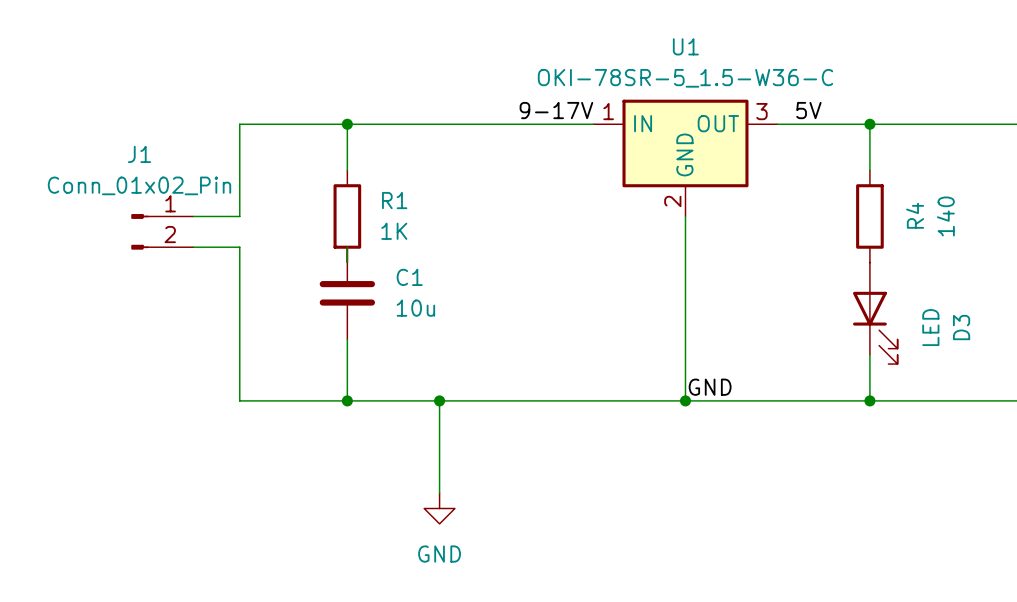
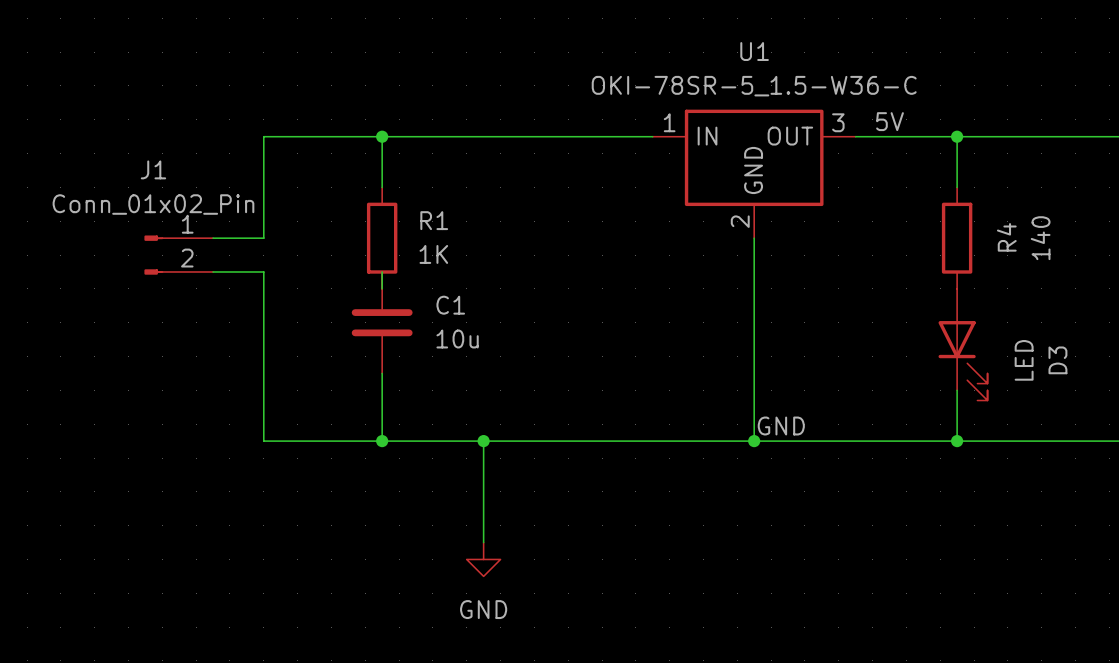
label: 9-17V (556, 110) -> none

